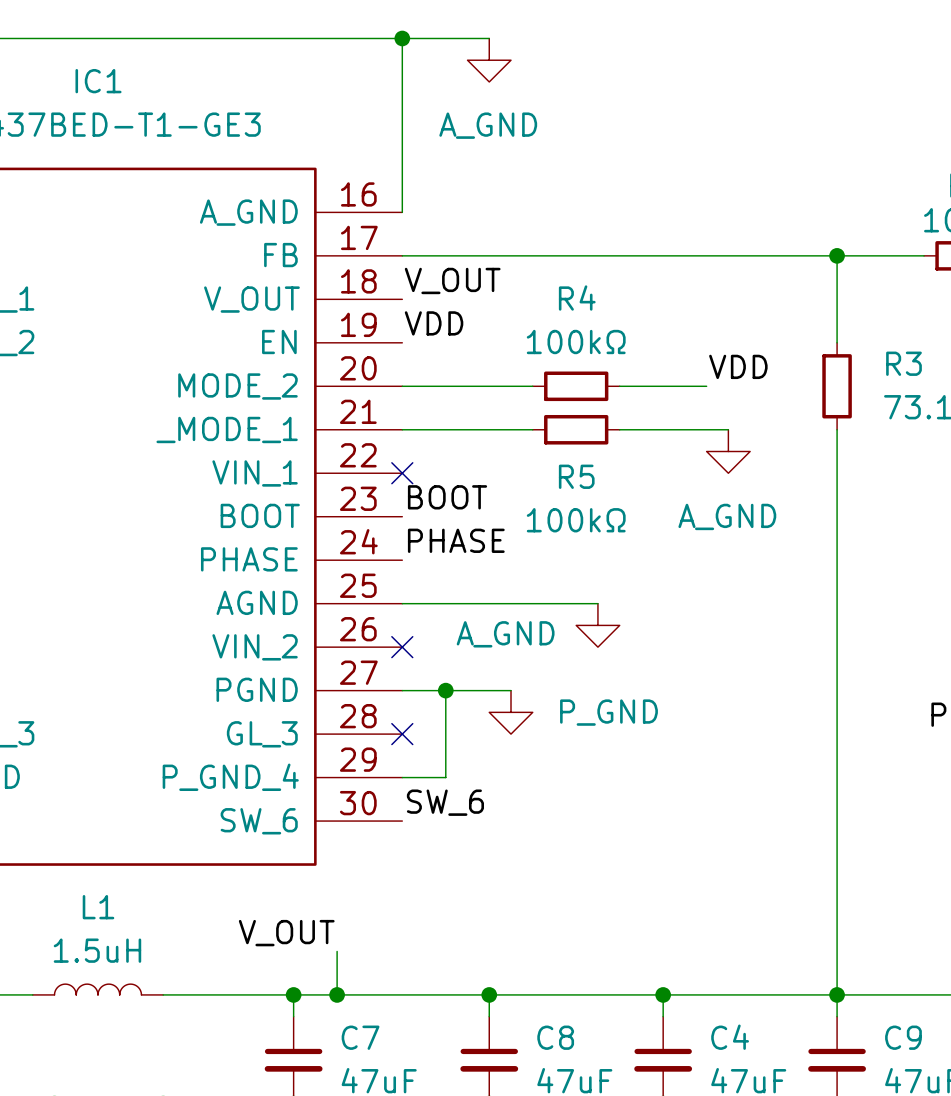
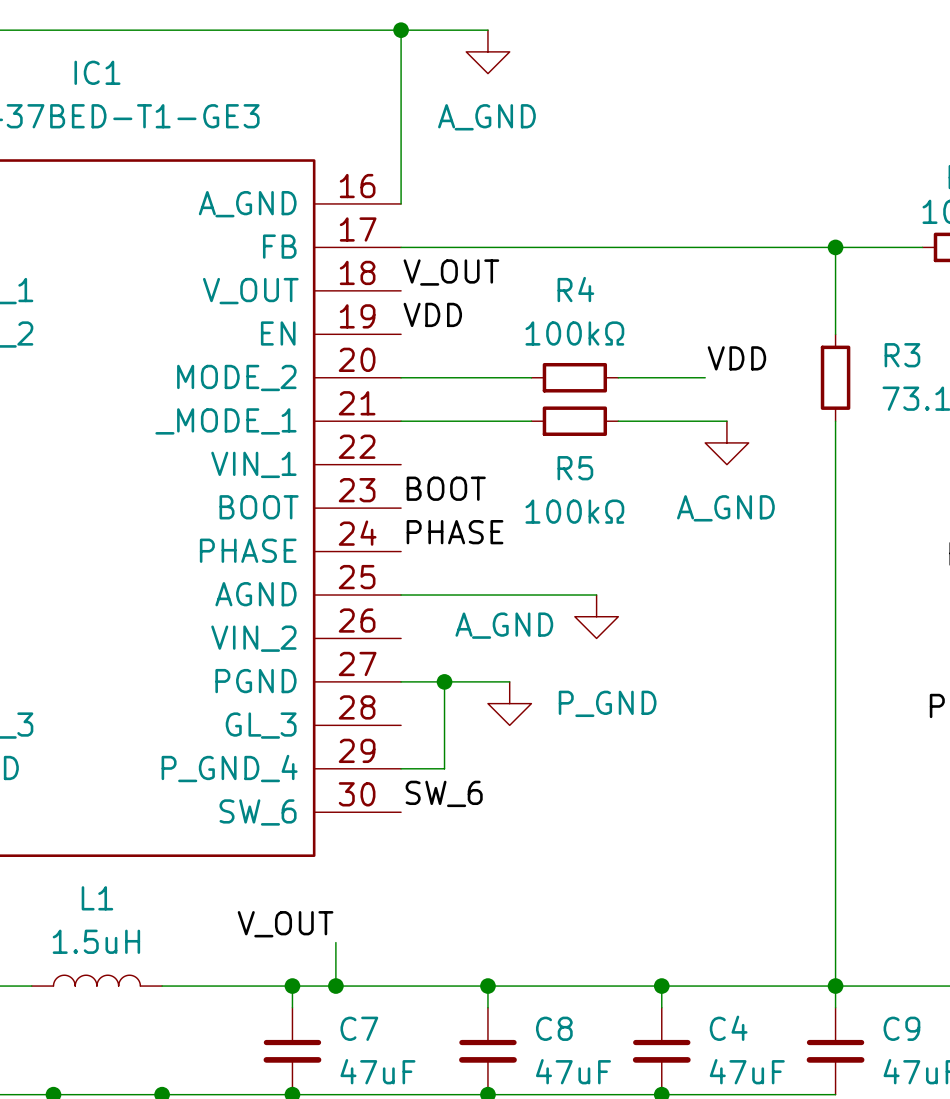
no-connect mark: (402, 473) -> none
no-connect mark: (402, 647) -> none
no-connect mark: (402, 734) -> none

